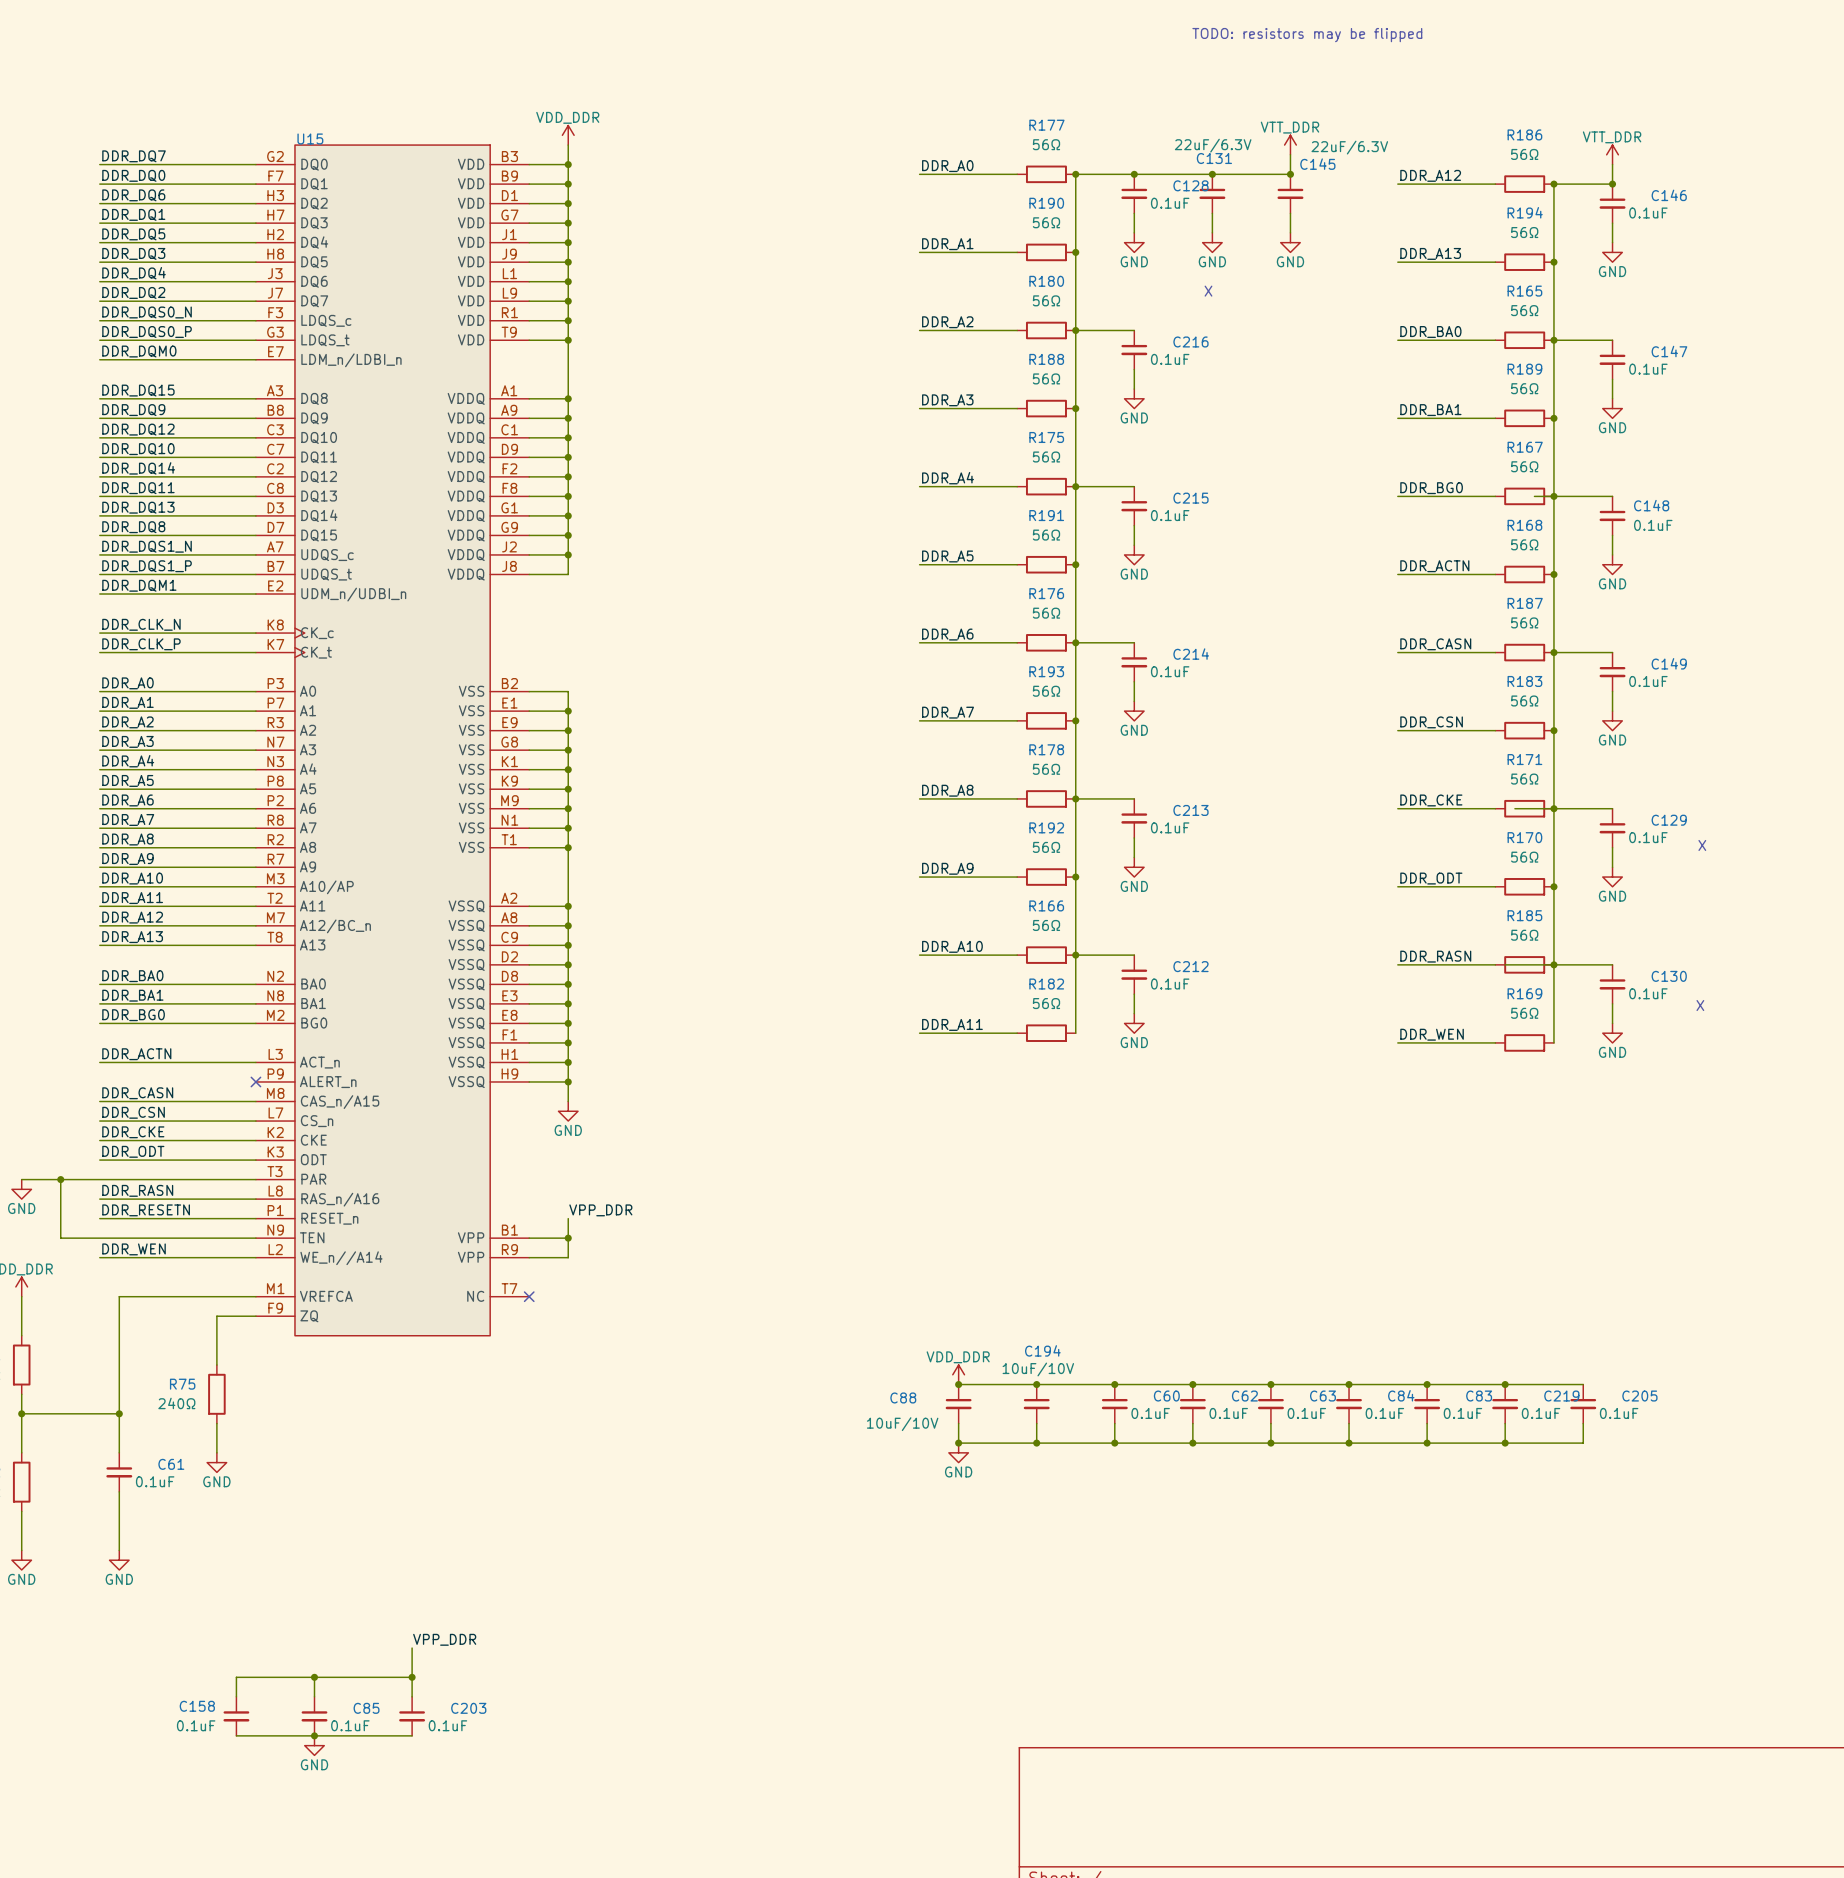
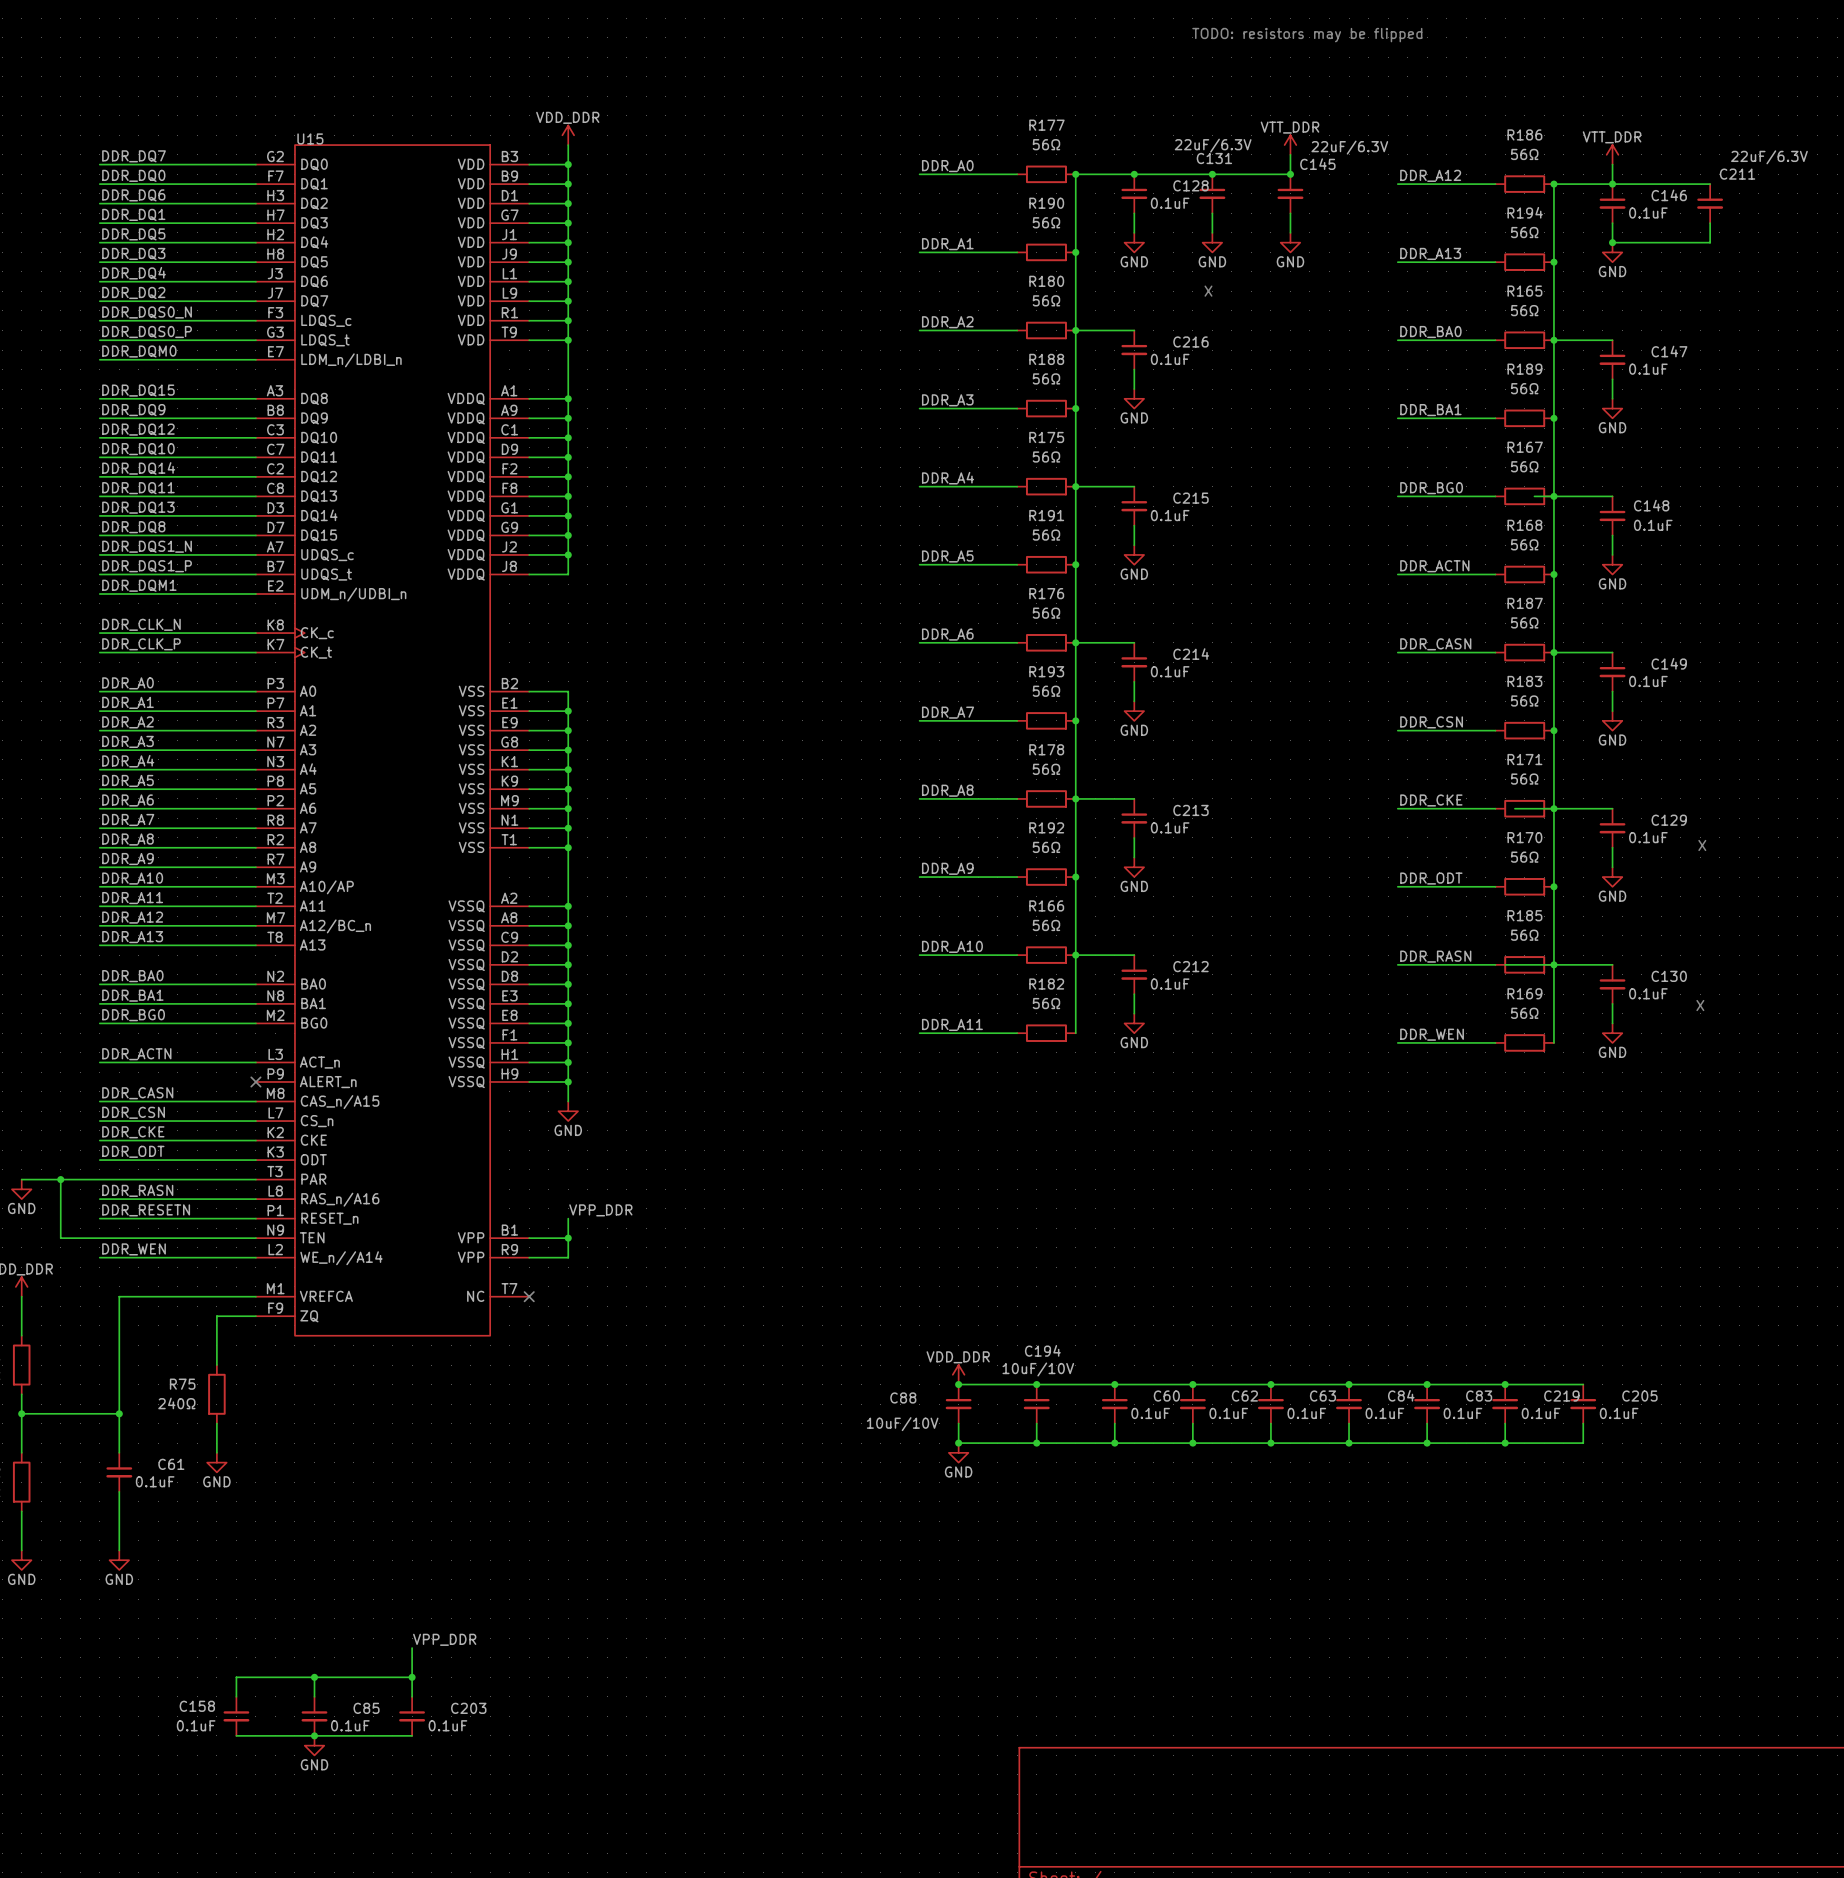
wire: none -> (1612, 184) (1710, 184)
C211: none -> (1710, 203)
wire: none -> (1710, 223) (1710, 242) (1612, 242)
junction: none -> (1612, 242)

